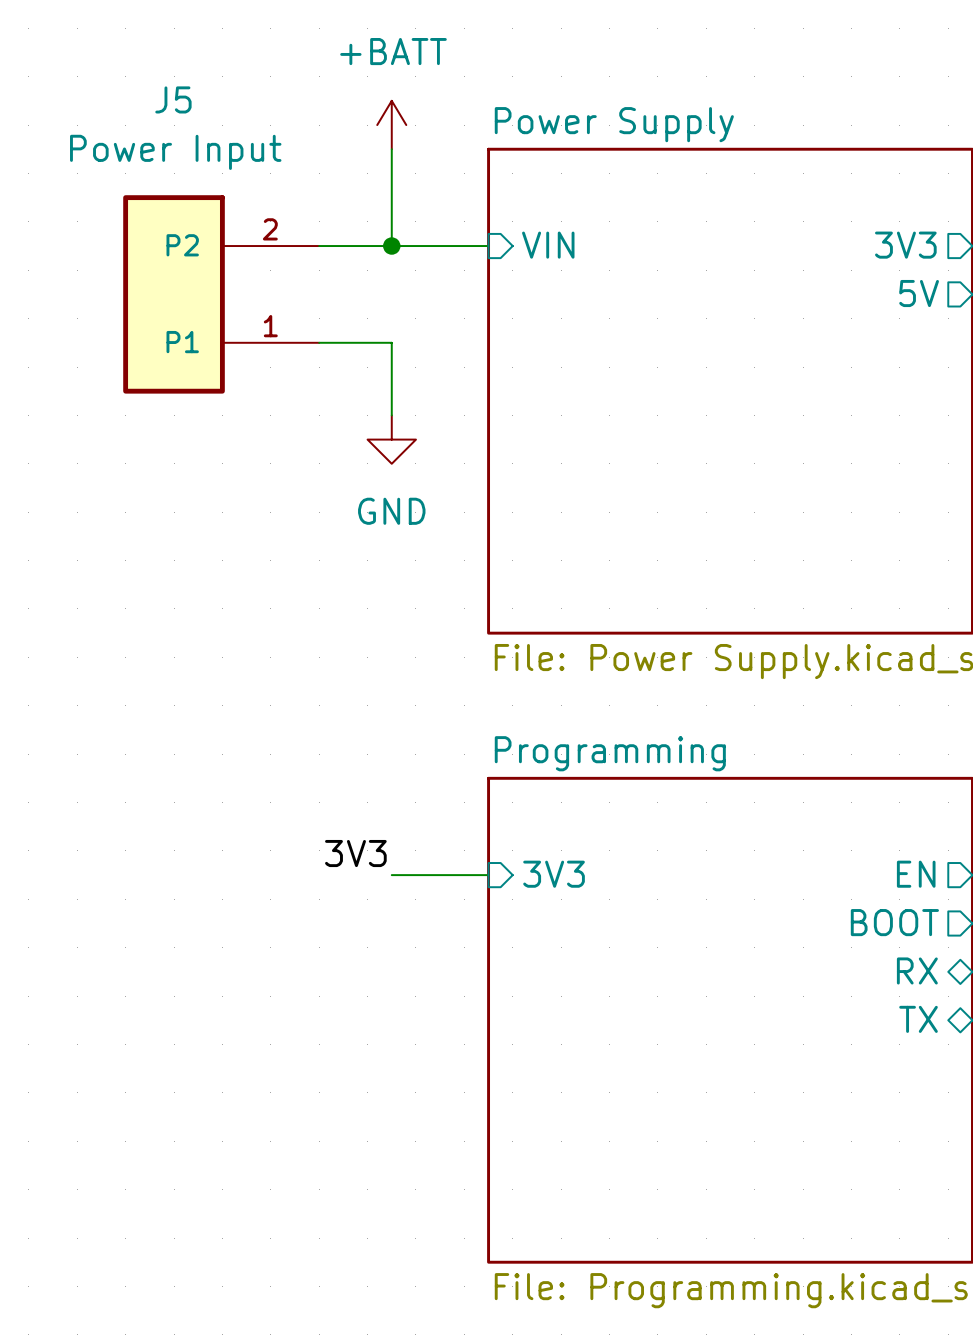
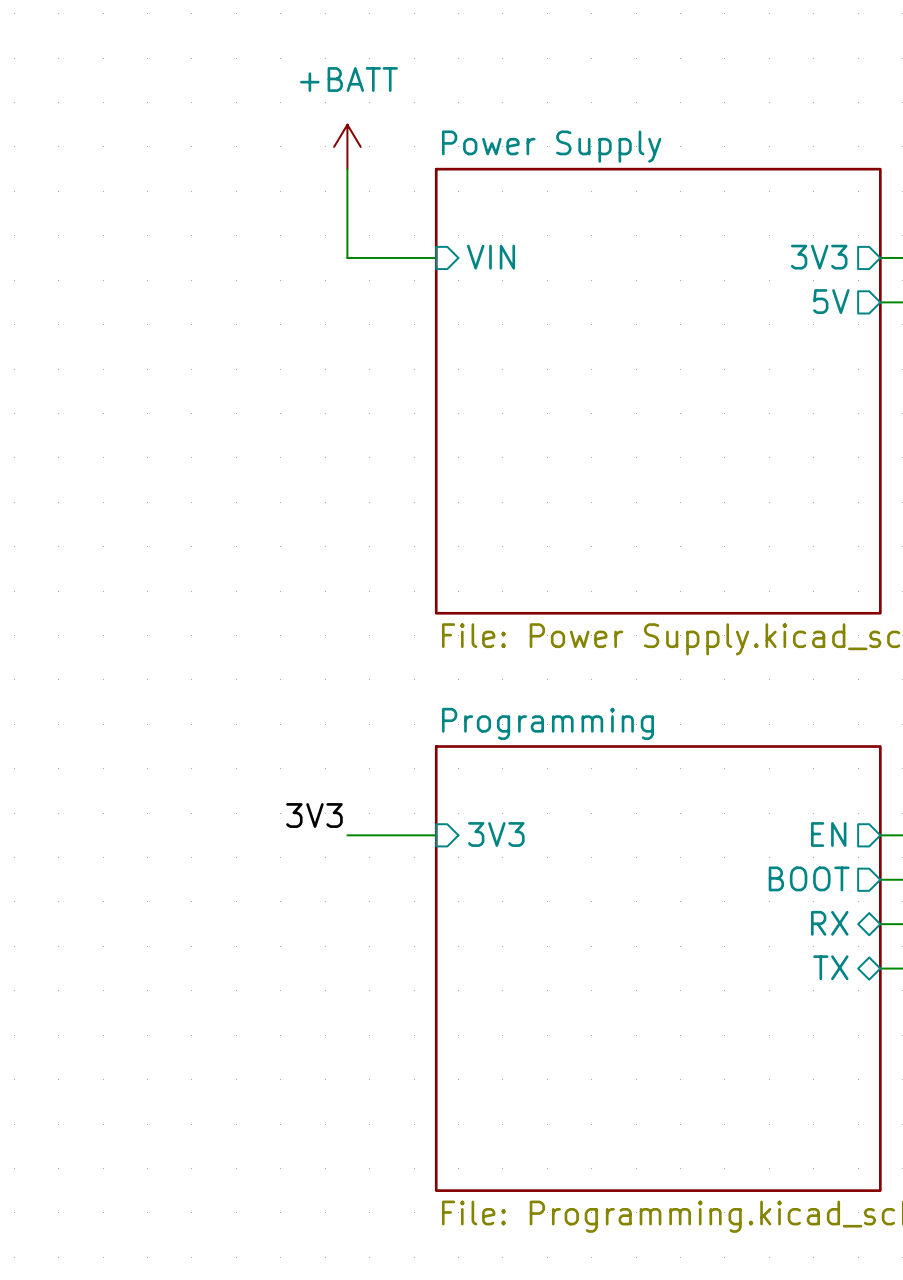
wire: (319, 246) (391, 246) -> none
junction: (391, 246) -> none
J5: Power Input (221, 294) -> none
wire: (319, 342) (391, 342) (391, 415) -> none
power symbol: GND (391, 439) -> none

